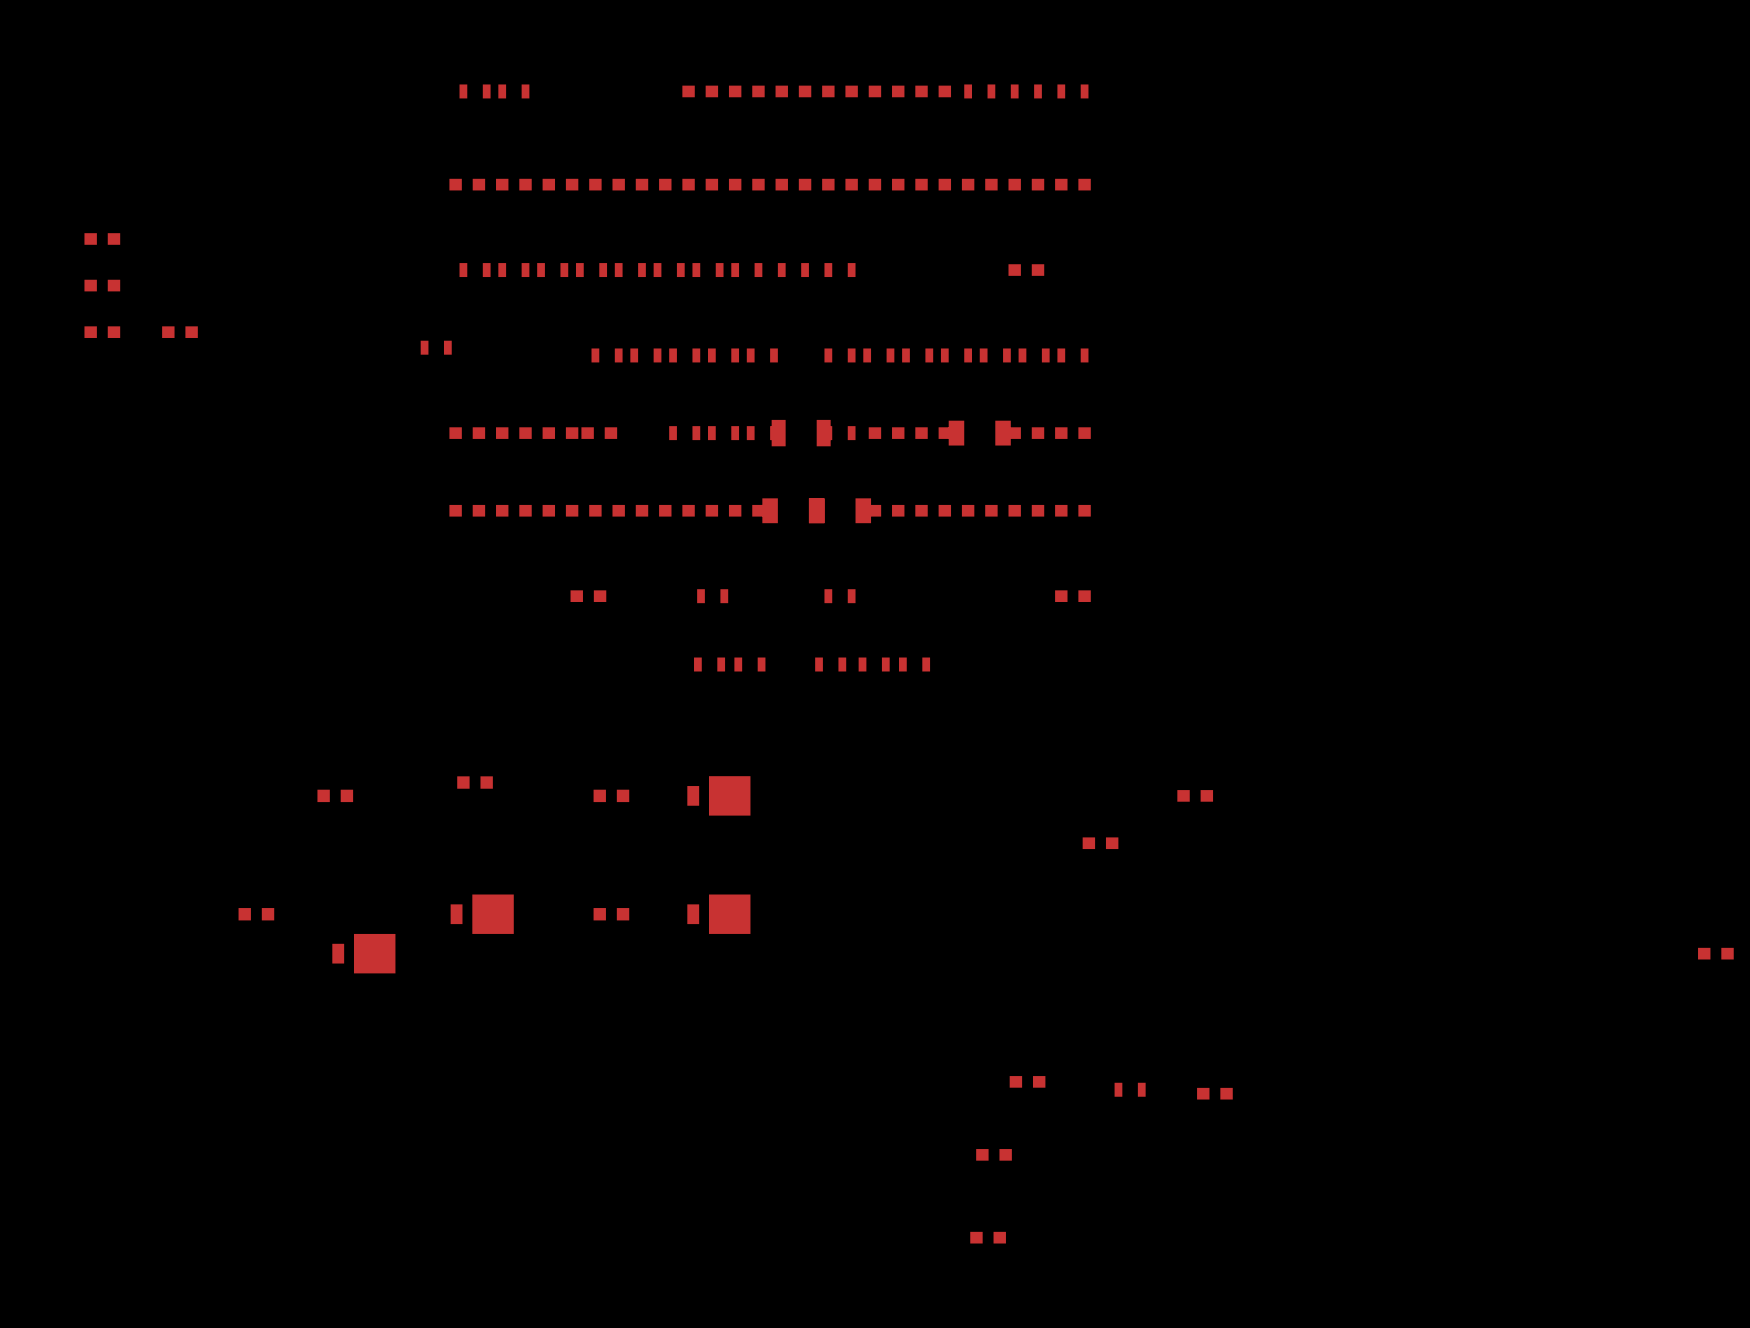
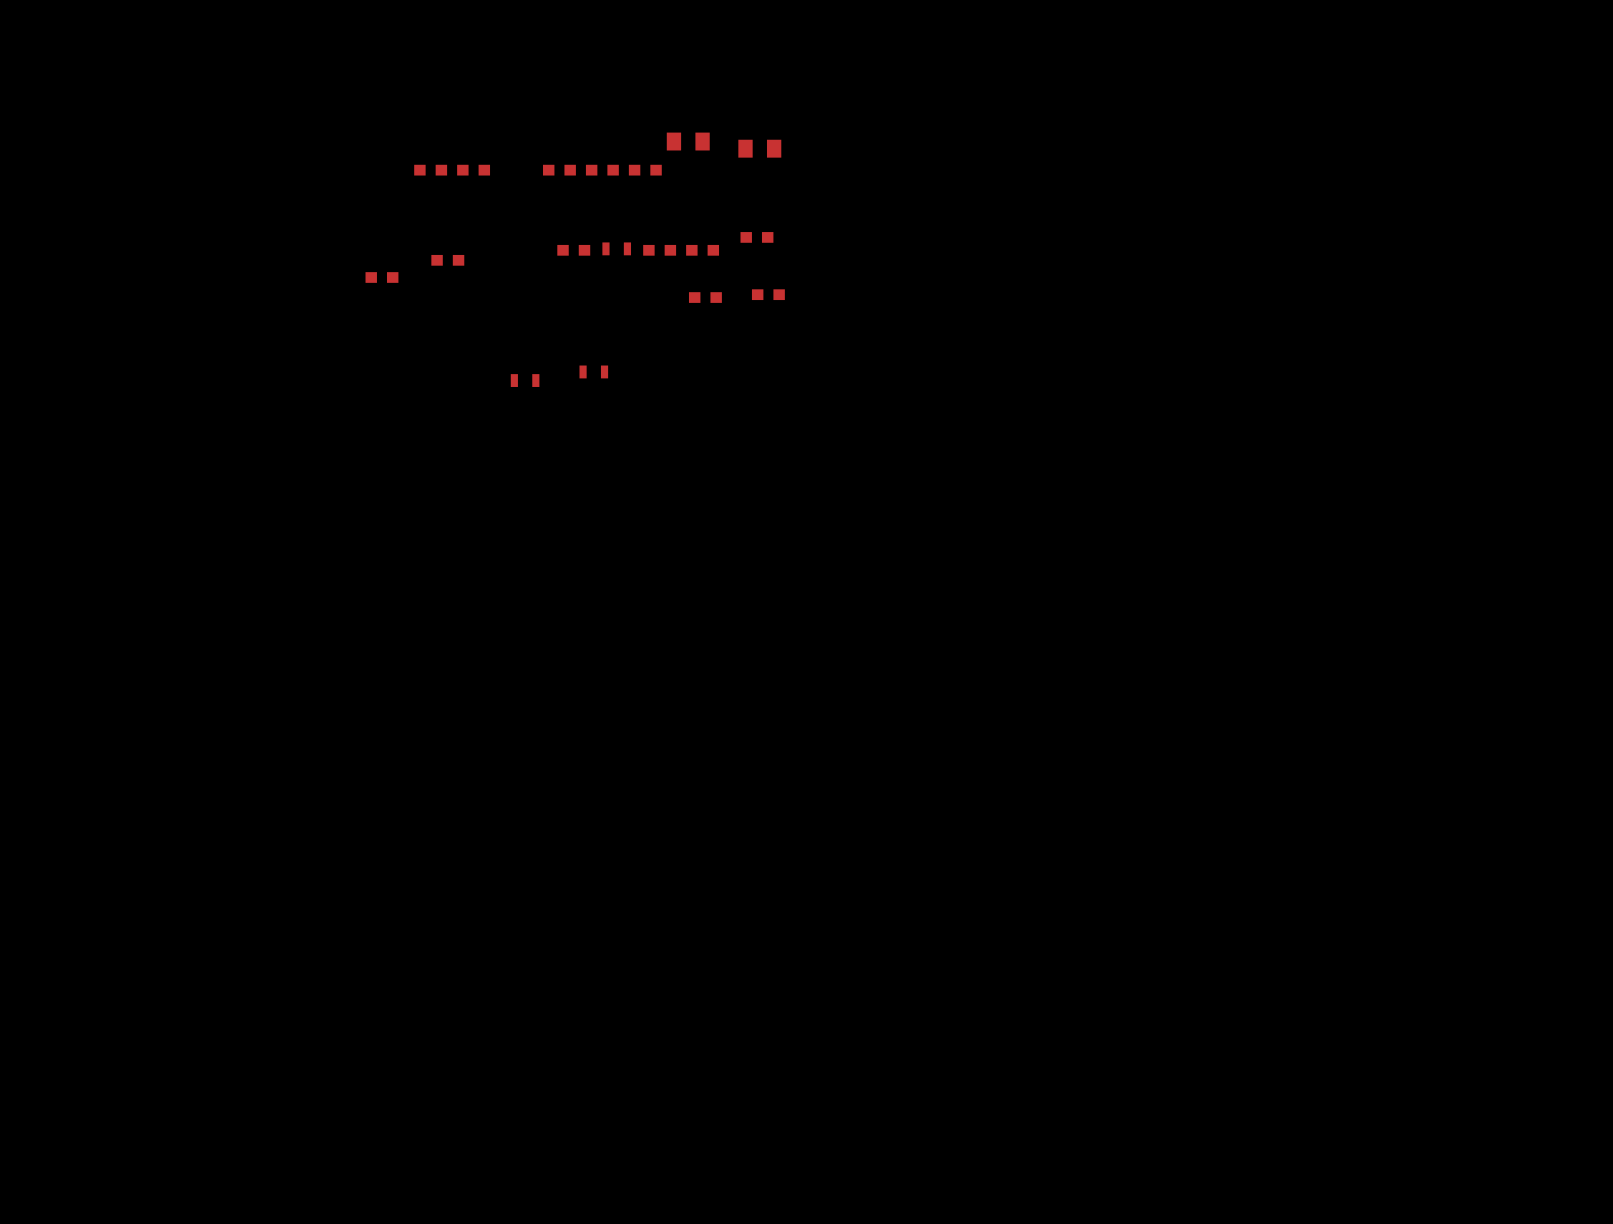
part: (475, 91) -> none
part: (513, 91) -> none
part: (700, 91) -> none
part: (746, 91) -> none
part: (793, 91) -> none
part: (839, 91) -> none
part: (886, 91) -> none
part: (933, 91) -> none
part: (979, 91) -> none
part: (1026, 91) -> none
part: (1072, 91) -> none
part: none -> (688, 141)
part: none -> (759, 148)
part: (560, 184) -> none
part: (746, 184) -> none
part: (793, 184) -> none
part: (839, 184) -> none
part: (886, 184) -> none
part: (933, 184) -> none
part: (979, 184) -> none
part: (1026, 184) -> none
part: (1072, 184) -> none
part: (102, 238) -> none
part: none -> (756, 237)
part footprint: [614, 263, 646, 278] -> [557, 244, 591, 256]
part footprint: [692, 263, 724, 278] -> [643, 244, 677, 256]
part: (475, 270) -> none
part: (513, 270) -> none
part: (552, 270) -> none
part: (591, 270) -> none
part: (746, 270) -> none
part: (793, 270) -> none
part: (839, 270) -> none
part: (1026, 270) -> none
part: none -> (702, 250)
part: none -> (447, 260)
part: (102, 285) -> none
part: none -> (381, 277)
part: none -> (768, 294)
part: none -> (705, 297)
part: (102, 332) -> none
part: (179, 332) -> none
part: (436, 347) -> none
part: (607, 355) -> none
part: (645, 355) -> none
part: (684, 355) -> none
part: (723, 355) -> none
part: (762, 355) -> none
part: (839, 355) -> none
part: (878, 355) -> none
part: (917, 355) -> none
part: (956, 355) -> none
part: (995, 355) -> none
part: (1034, 355) -> none
part: (1072, 355) -> none
part: none -> (593, 371)
part: none -> (525, 380)
part: (467, 433) -> none
part: (513, 433) -> none
part: (560, 433) -> none
part: (599, 433) -> none
part: (684, 433) -> none
part: (723, 433) -> none
part: (762, 433) -> none
part: (801, 433) -> none
part: (839, 433) -> none
part: (886, 433) -> none
part: (933, 433) -> none
part: (979, 433) -> none
part: (1026, 433) -> none
part: (1072, 433) -> none
part: (467, 510) -> none
part: (513, 510) -> none
part: (560, 510) -> none
part: (607, 510) -> none
part: (653, 510) -> none
part: (700, 510) -> none
part: (746, 510) -> none
part: (793, 510) -> none
part: (839, 510) -> none
part: (886, 510) -> none
part: (933, 510) -> none
part: (979, 510) -> none
part: (1026, 510) -> none
part: (1072, 510) -> none
part: (588, 596) -> none
part: (712, 596) -> none
part: (839, 596) -> none
part: (1072, 596) -> none
part: (709, 664) -> none
part: (749, 664) -> none
part: (830, 664) -> none
part: (874, 664) -> none
part: (914, 664) -> none
part: (475, 782) -> none
part: (335, 795) -> none
part: (611, 795) -> none
part: (718, 795) -> none
part: (1195, 795) -> none
part: (1100, 843) -> none
part: (256, 914) -> none
part: (482, 914) -> none
part: (611, 914) -> none
part: (718, 914) -> none
part: (363, 953) -> none
part: (1715, 953) -> none
part: (1027, 1081) -> none
part: (1130, 1089) -> none
part: (1214, 1093) -> none
part: (994, 1154) -> none
part: (988, 1237) -> none

